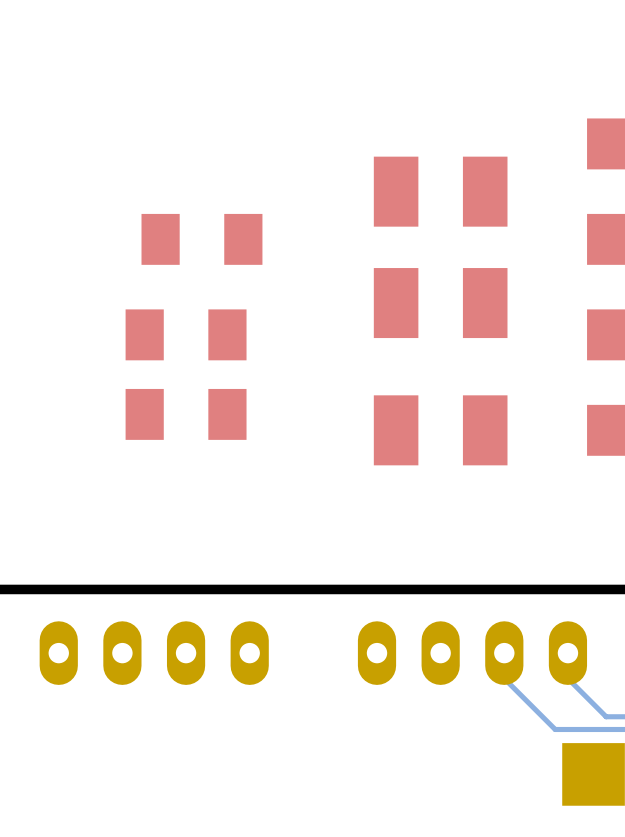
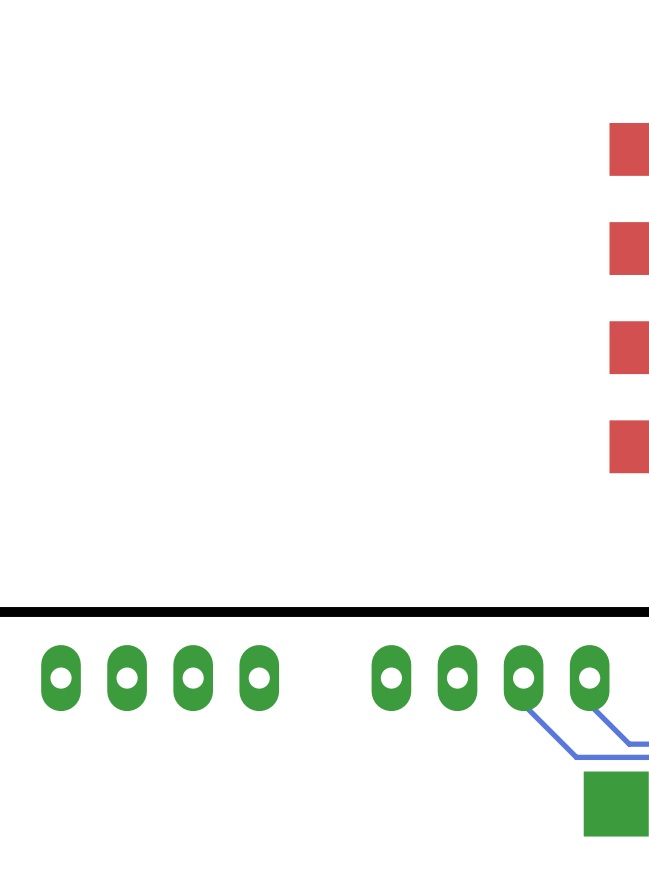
part: (440, 191) -> none
part: (201, 239) -> none
part: (440, 303) -> none
part: (186, 334) -> none
part: (186, 414) -> none
part: (440, 430) -> none

